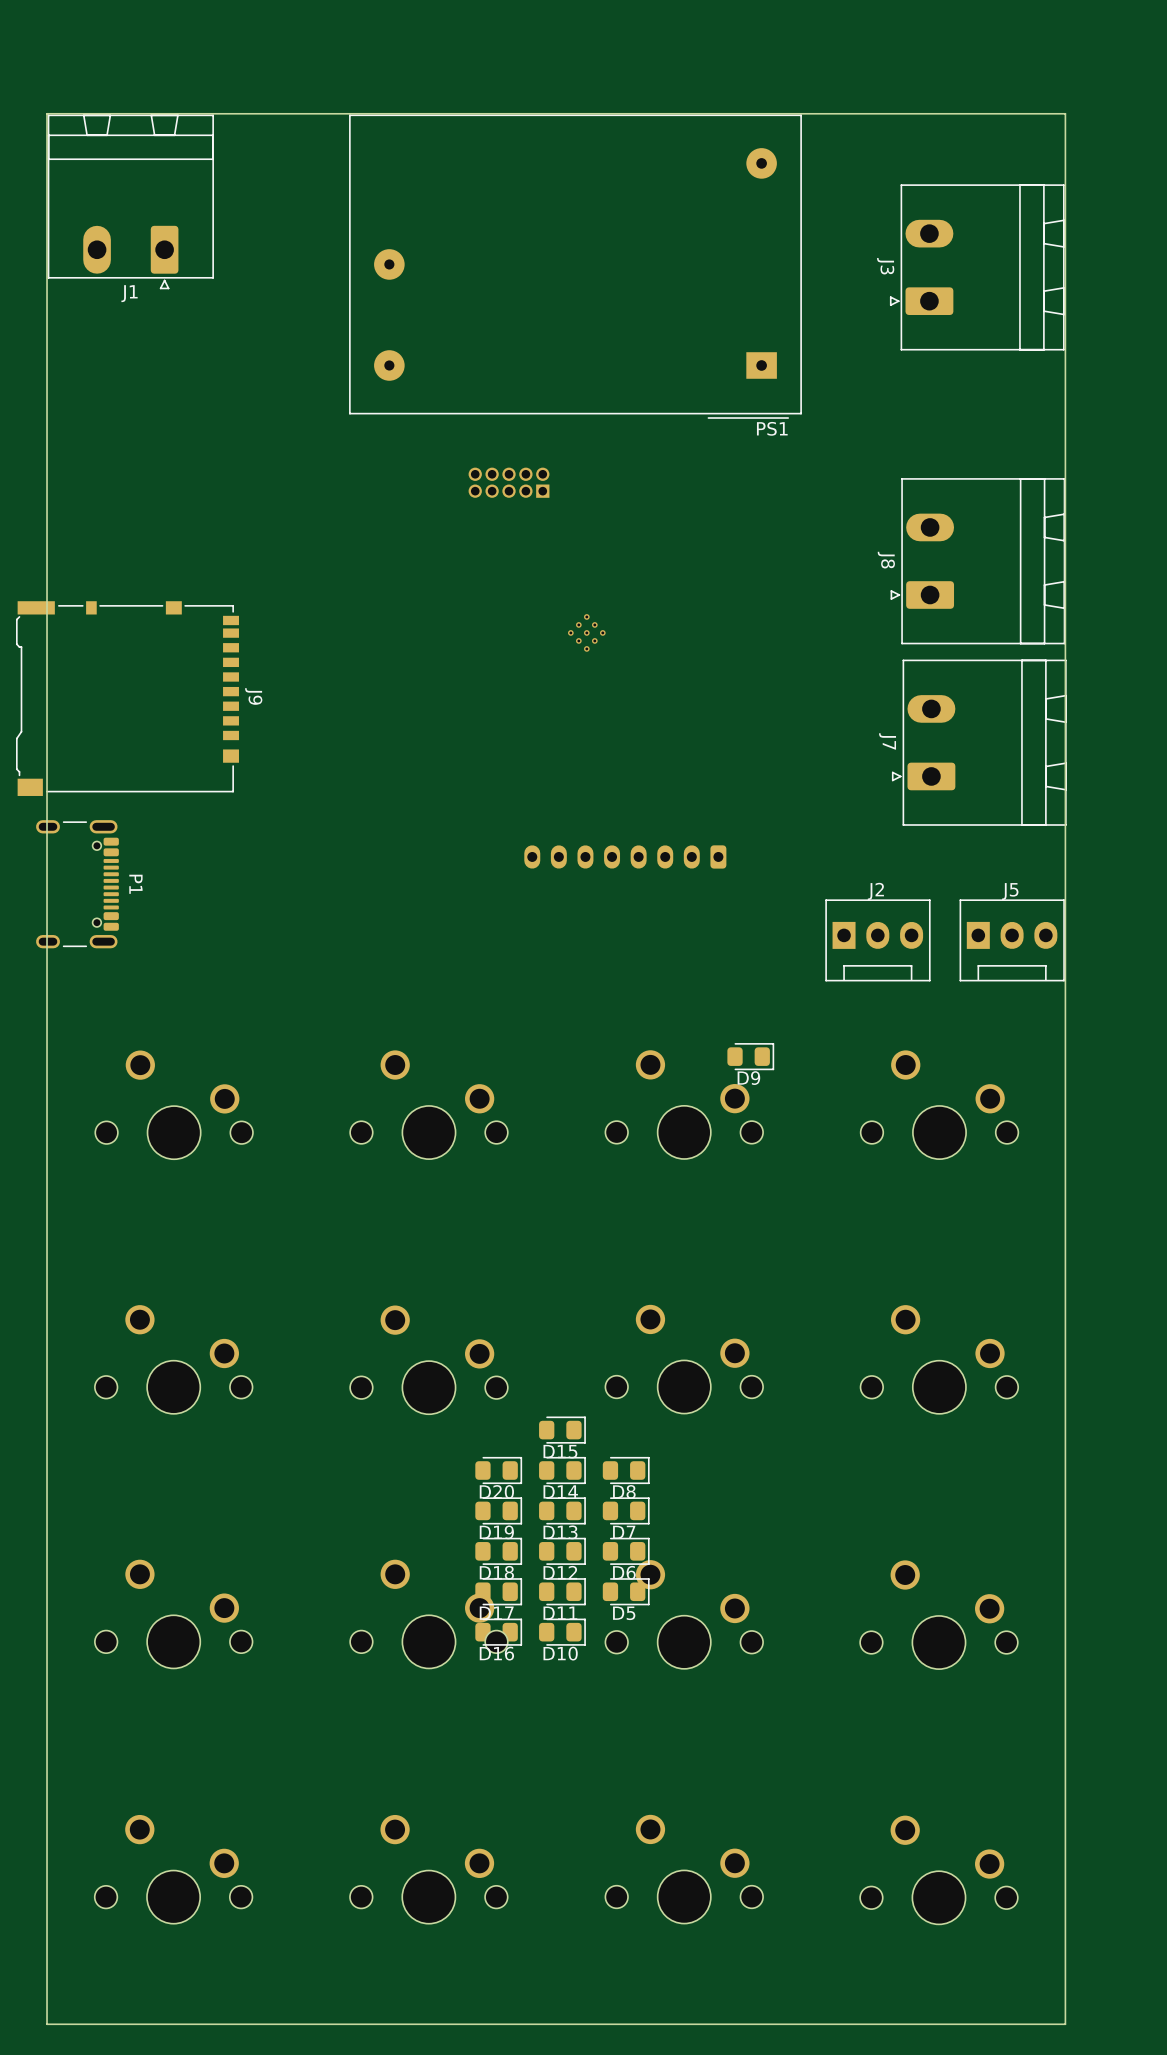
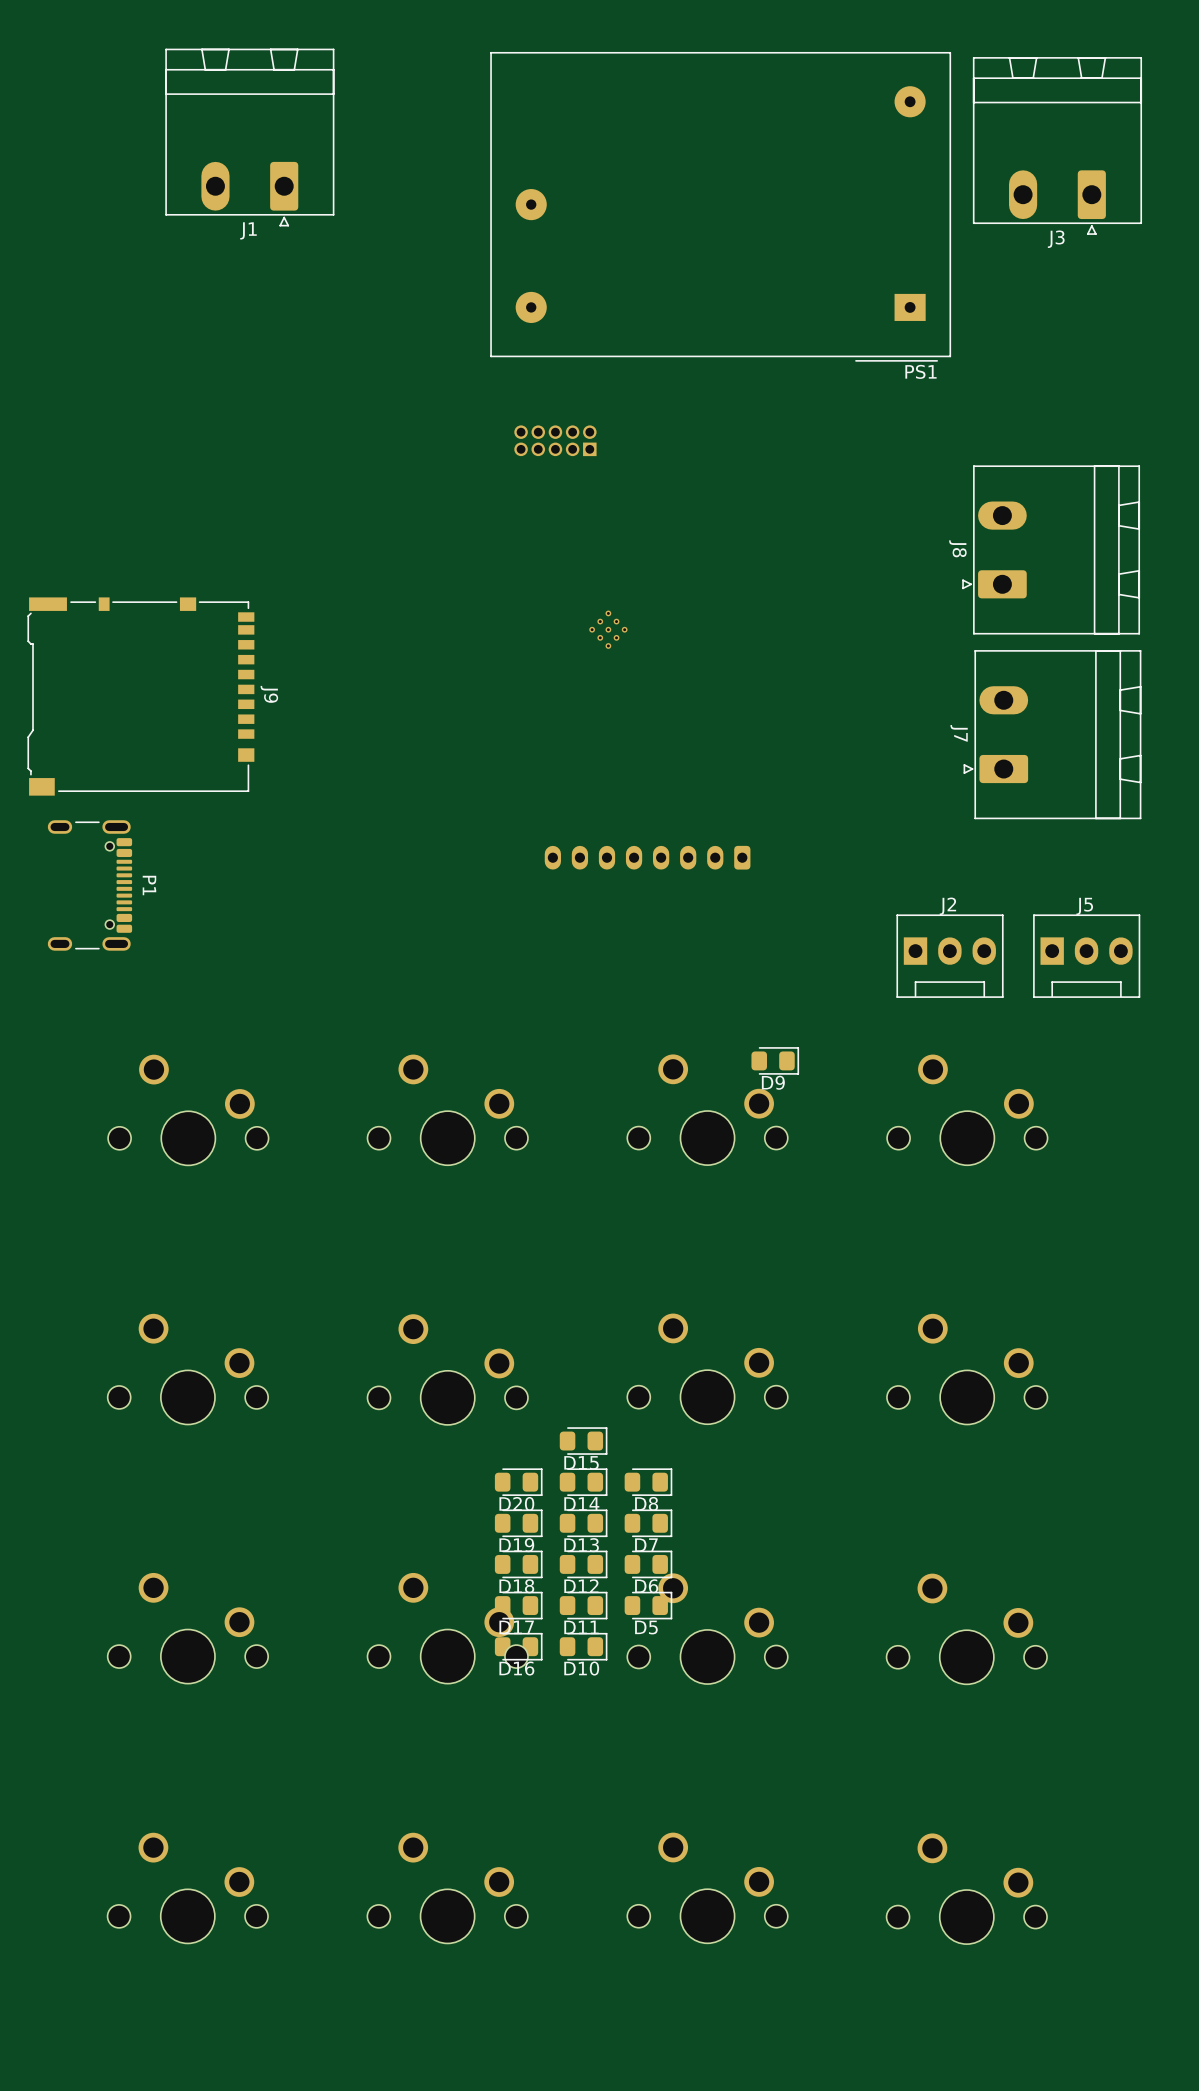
board edge: (1065, 113) (47, 113) (47, 2024) (1065, 2024) (1065, 113) -> none
J3 footprint: [889, 184, 1065, 351] -> [972, 57, 1143, 235]
J1 position: (130, 201) -> (249, 137)
PS1 position: (575, 266) -> (720, 206)
J3 name position: J3 (885, 266) -> J3 (1056, 239)
part position: (509, 482) -> (555, 440)
J8 position: (977, 561) -> (1051, 549)
J7 position: (979, 742) -> (1052, 734)
J2 position: (877, 940) -> (950, 956)
J5 position: (1012, 940) -> (1086, 956)

